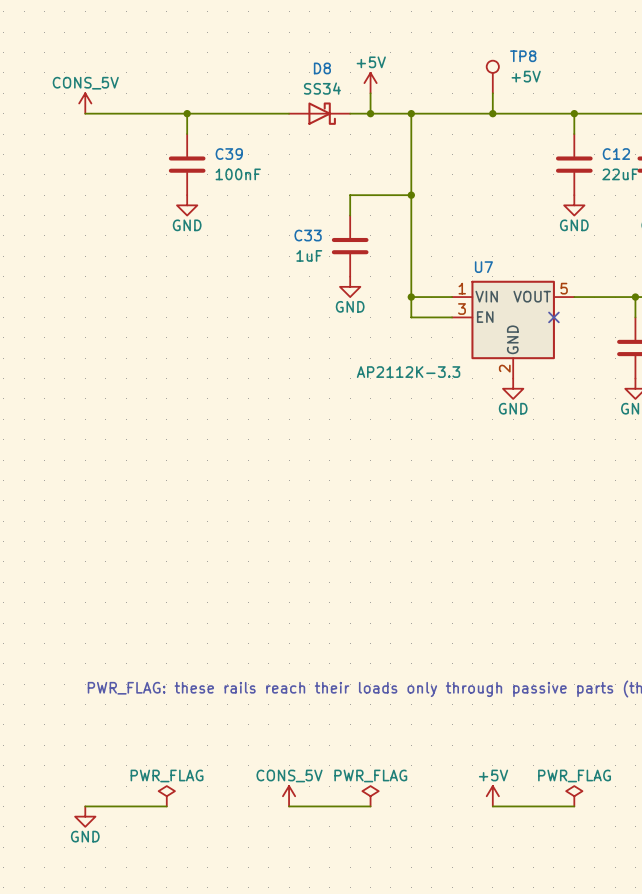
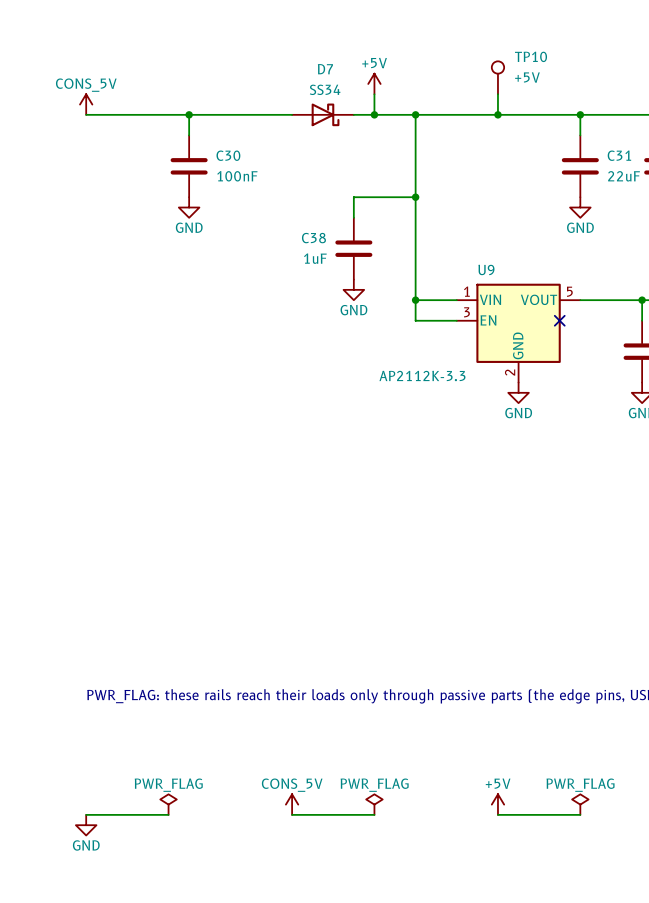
TP8 name: TP8 (523, 56) -> TP10 (531, 56)
D8 name: D8 (322, 68) -> D7 (325, 69)
C39 name: C39 (229, 154) -> C30 (228, 155)
C12 name: C12 (616, 154) -> C31 (619, 155)
C33 name: C33 (308, 235) -> C38 (313, 238)
U7 name: U7 (483, 267) -> U9 (486, 269)

